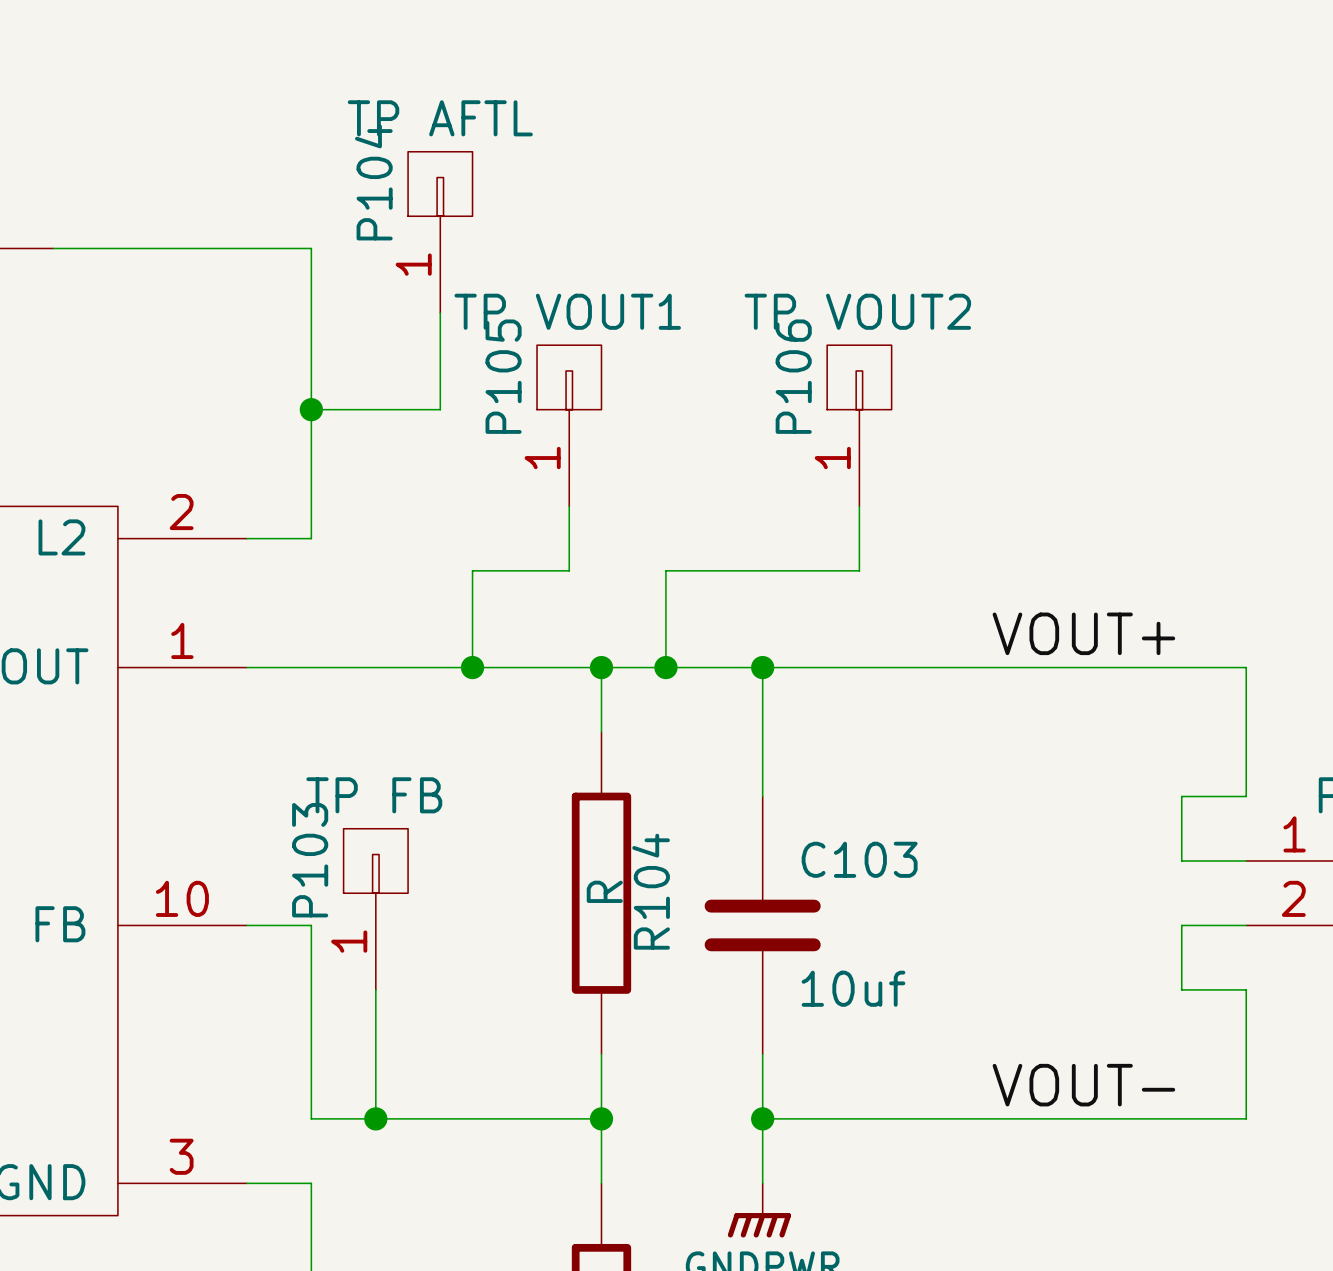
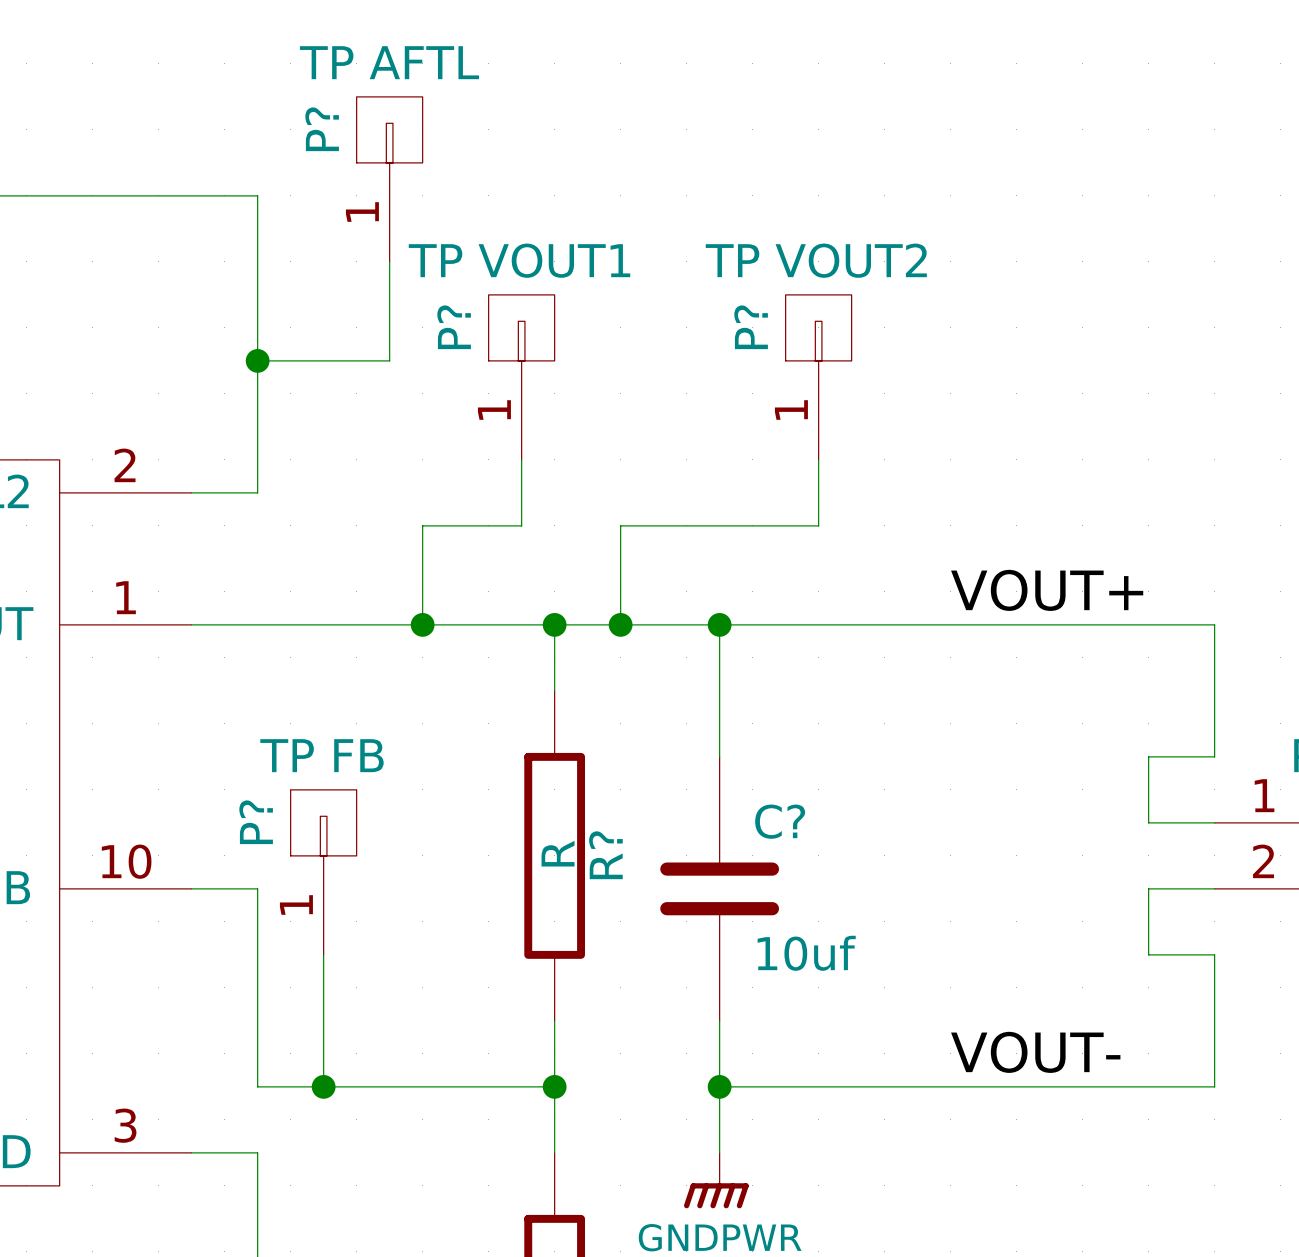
P104 name: P104 (373, 182) -> P? (322, 129)
P105 name: P105 (503, 376) -> P? (454, 327)
P106 name: P106 (793, 376) -> P? (751, 327)
C103 name: C103 (859, 859) -> C? (780, 821)
P103 name: P103 (310, 860) -> P? (256, 822)
R104 name: R104 (651, 891) -> R? (605, 855)

